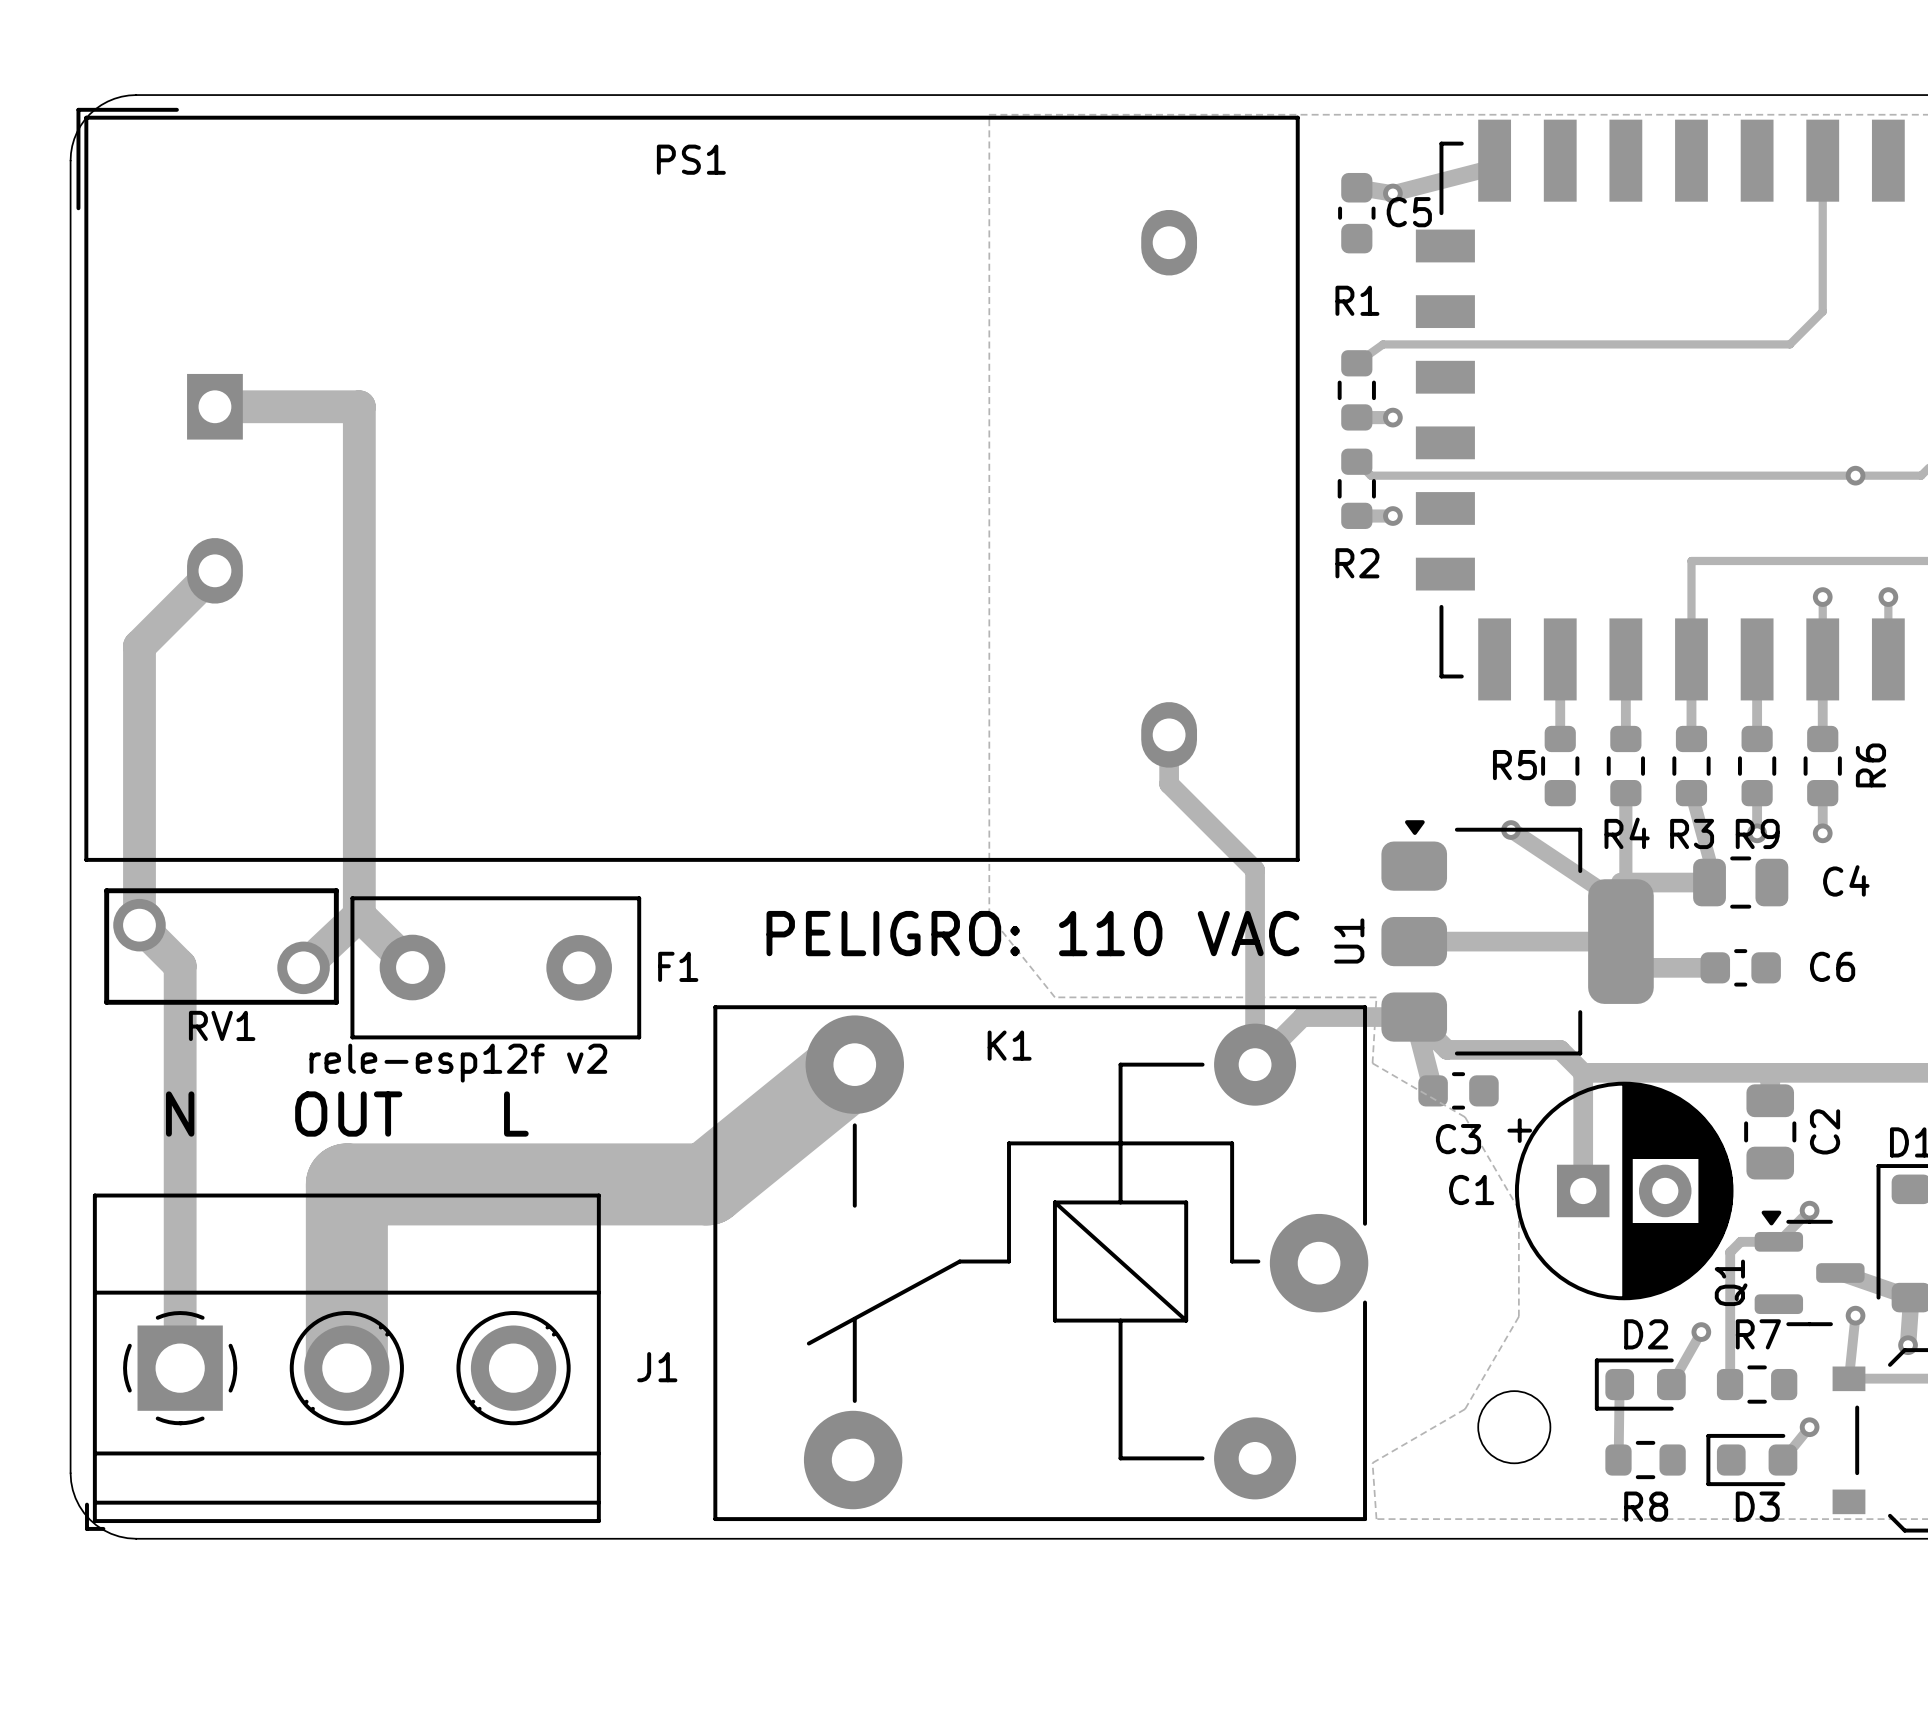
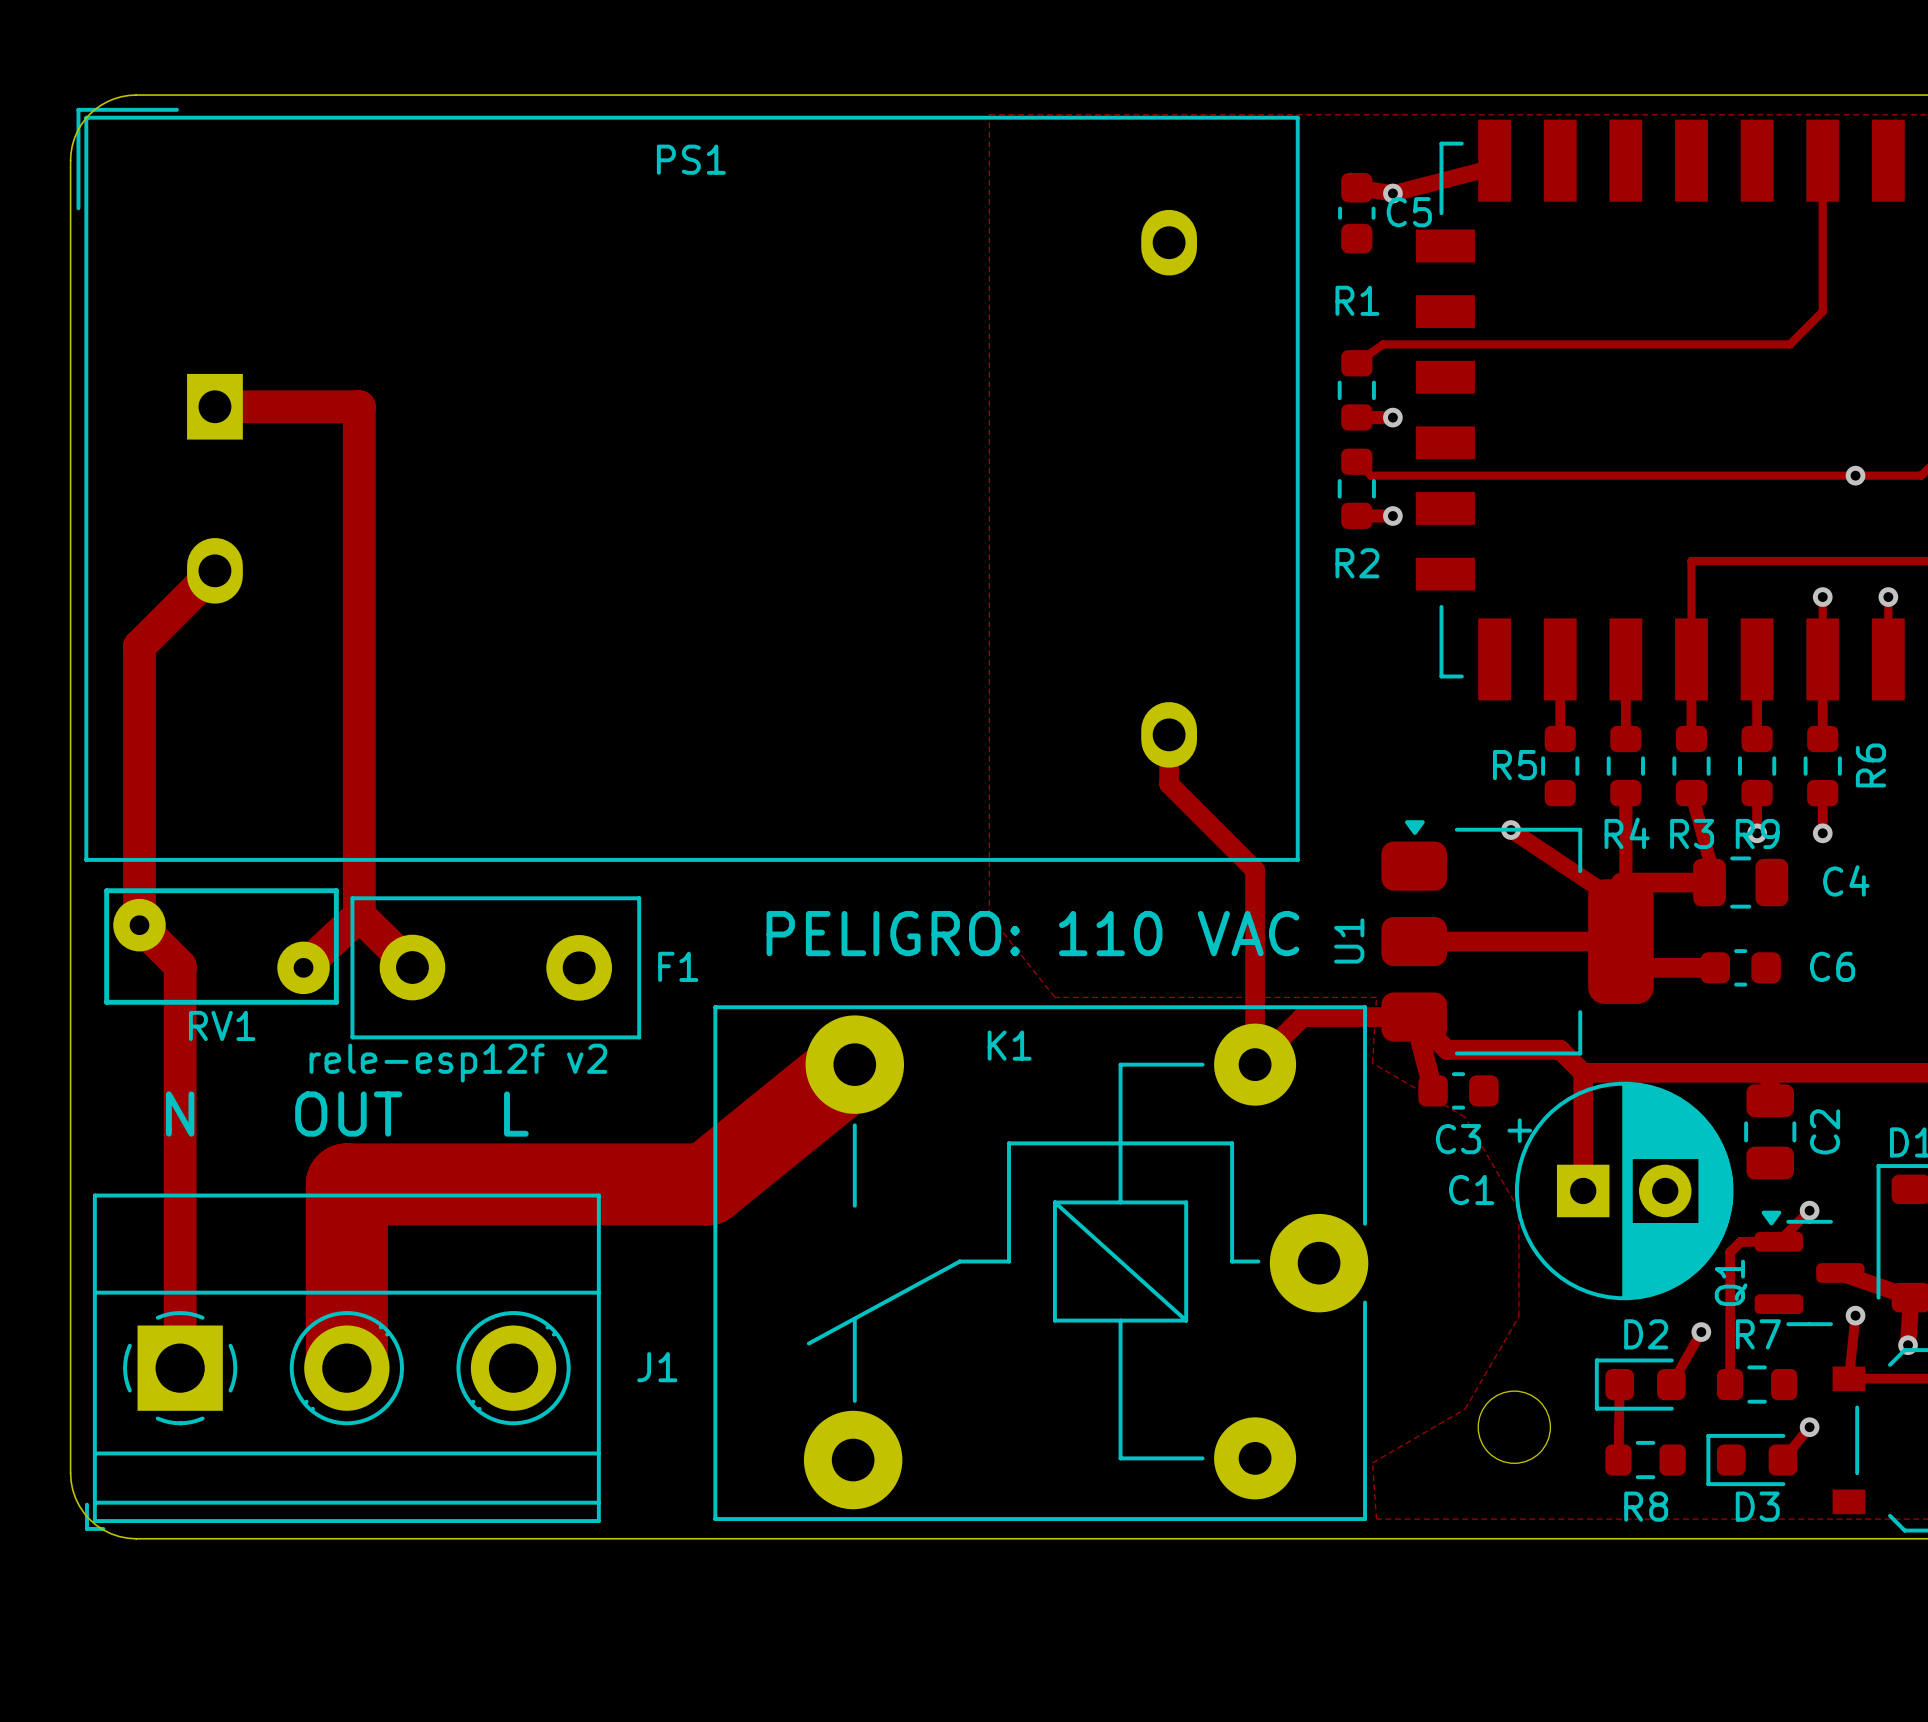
RV1 footprint: [104, 888, 339, 1005] -> [104, 888, 339, 1005]

